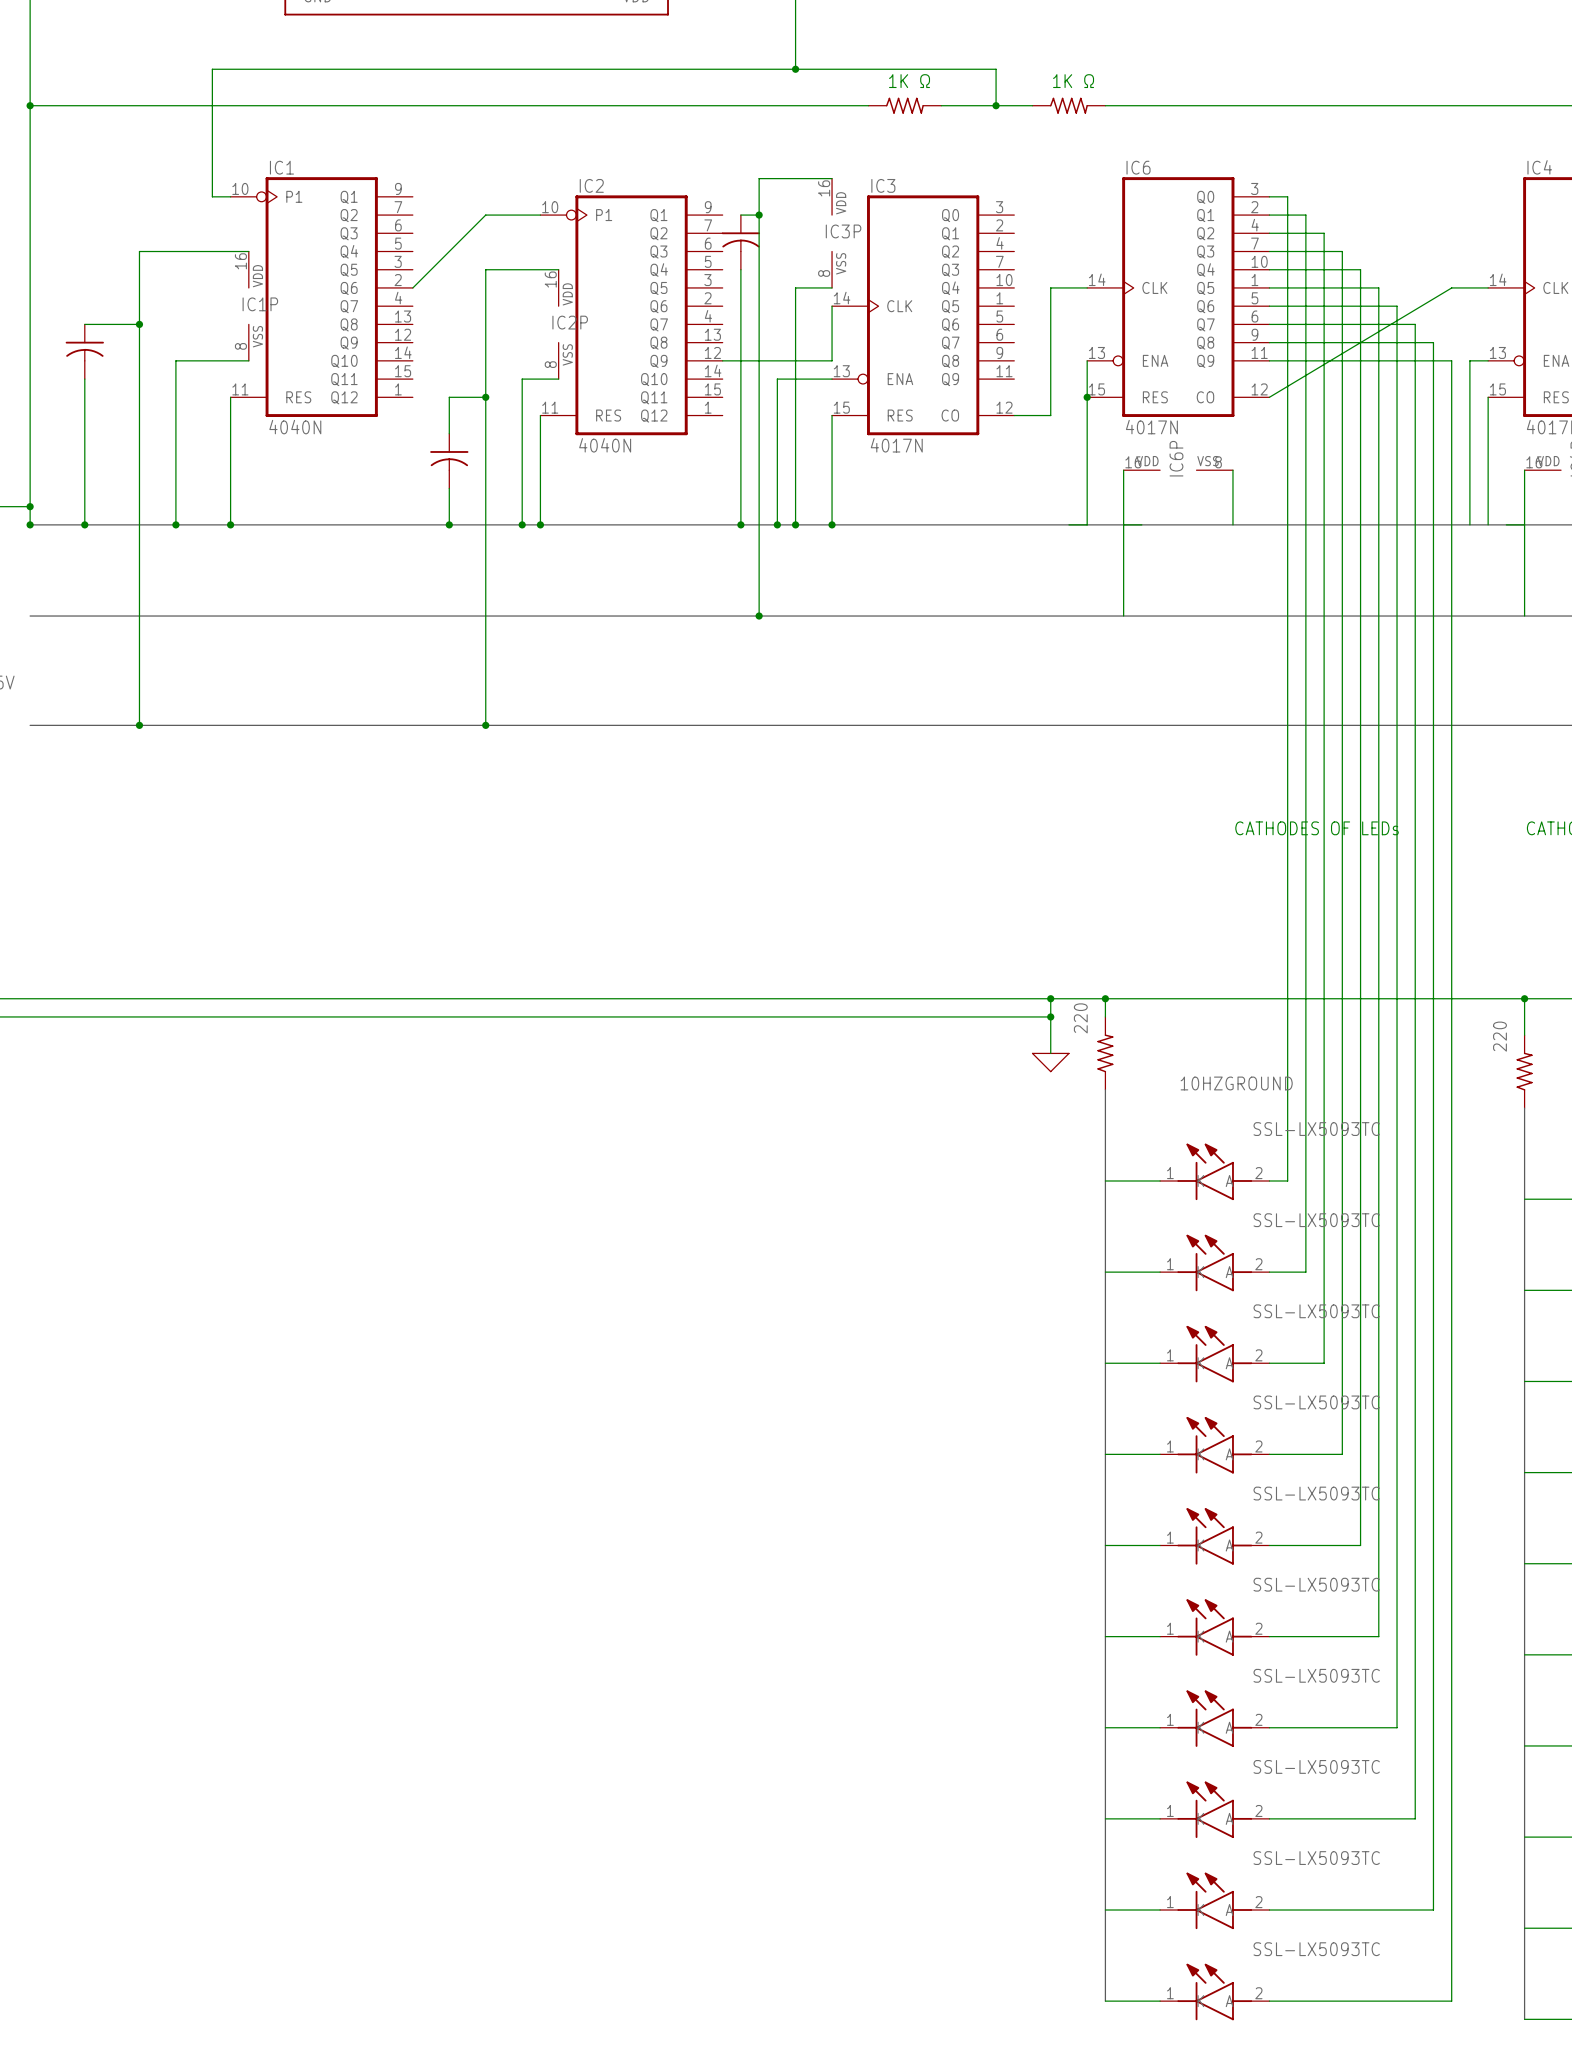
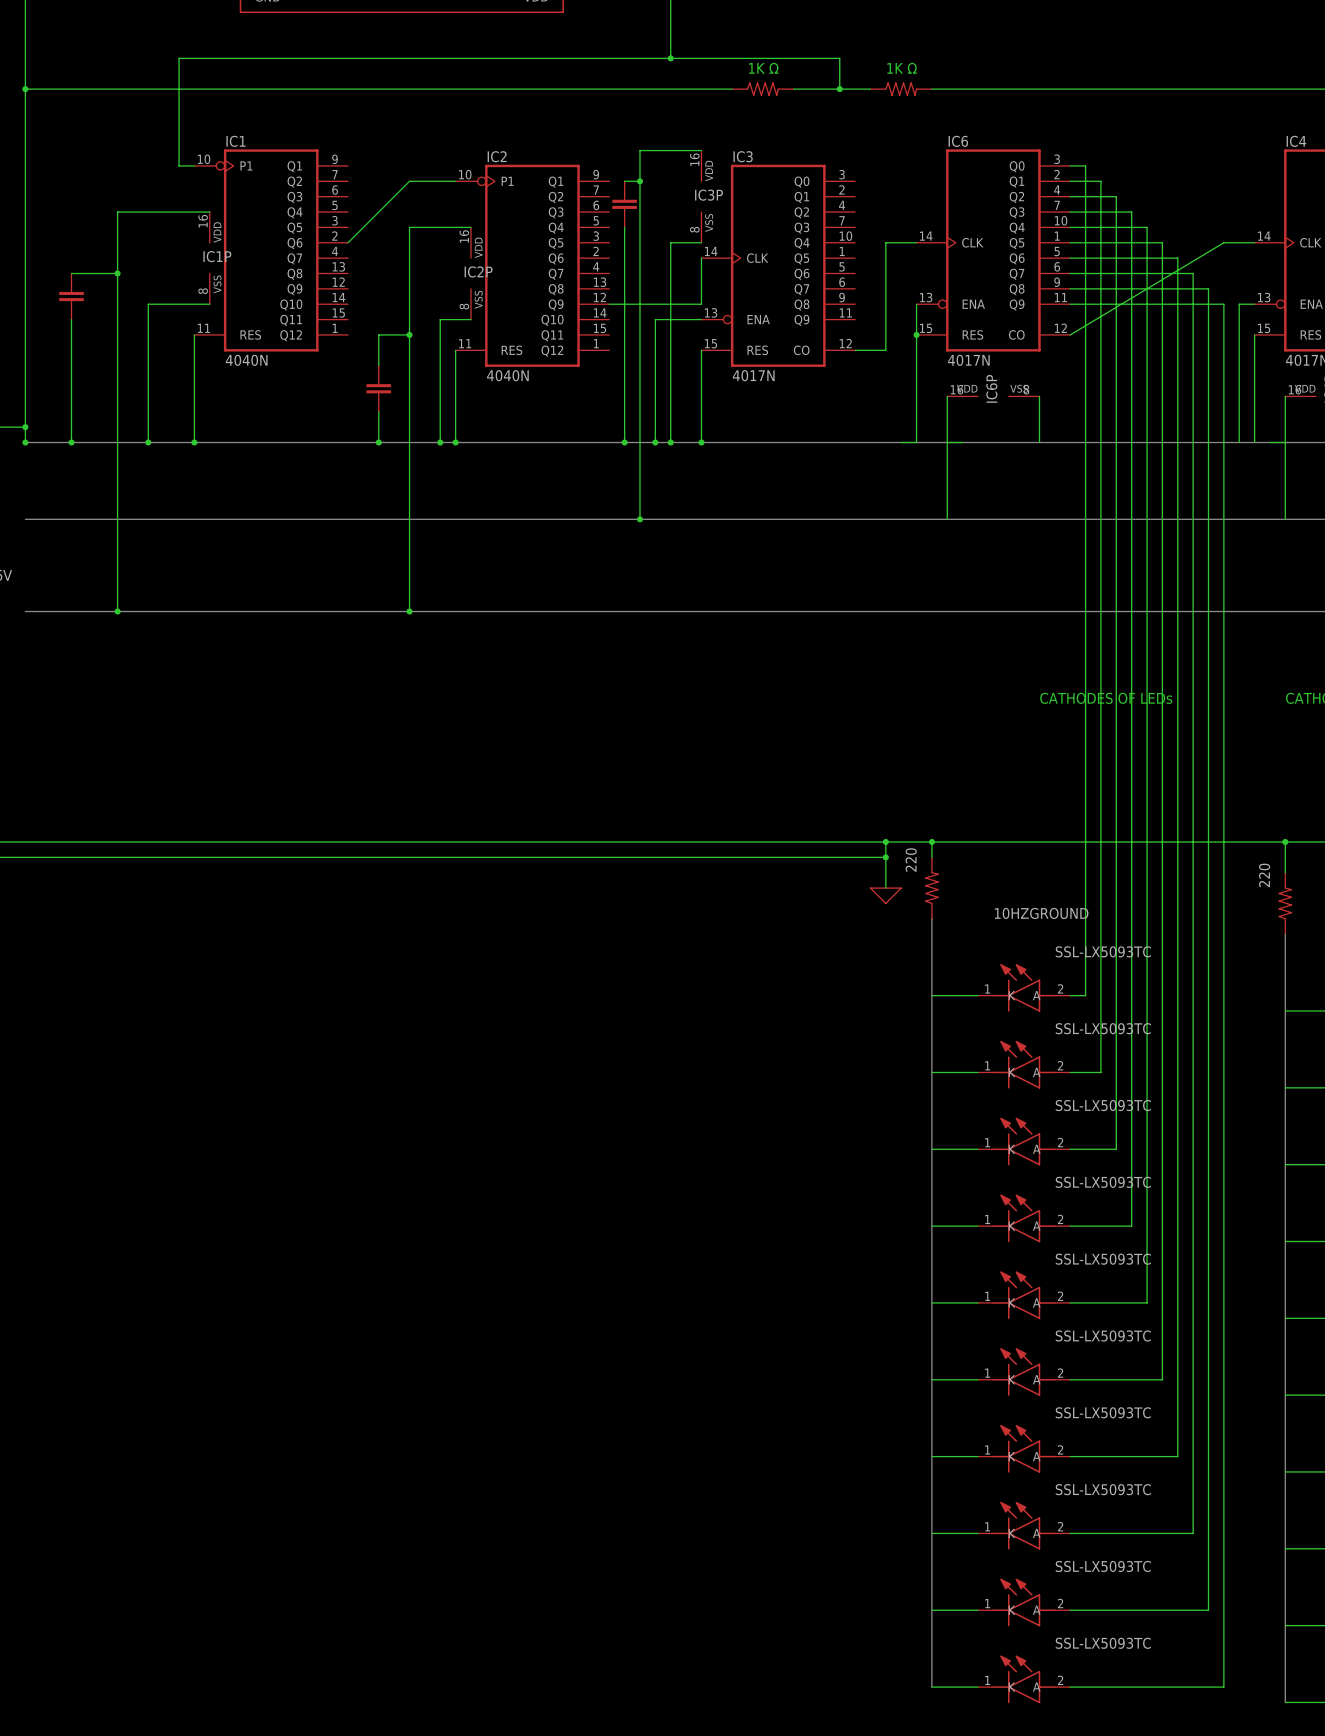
part symbol: [721, 215, 761, 270] -> [612, 180, 637, 228]
part symbol: [65, 324, 104, 380] -> [59, 273, 84, 321]
part symbol: [430, 433, 469, 489] -> [366, 365, 392, 413]

